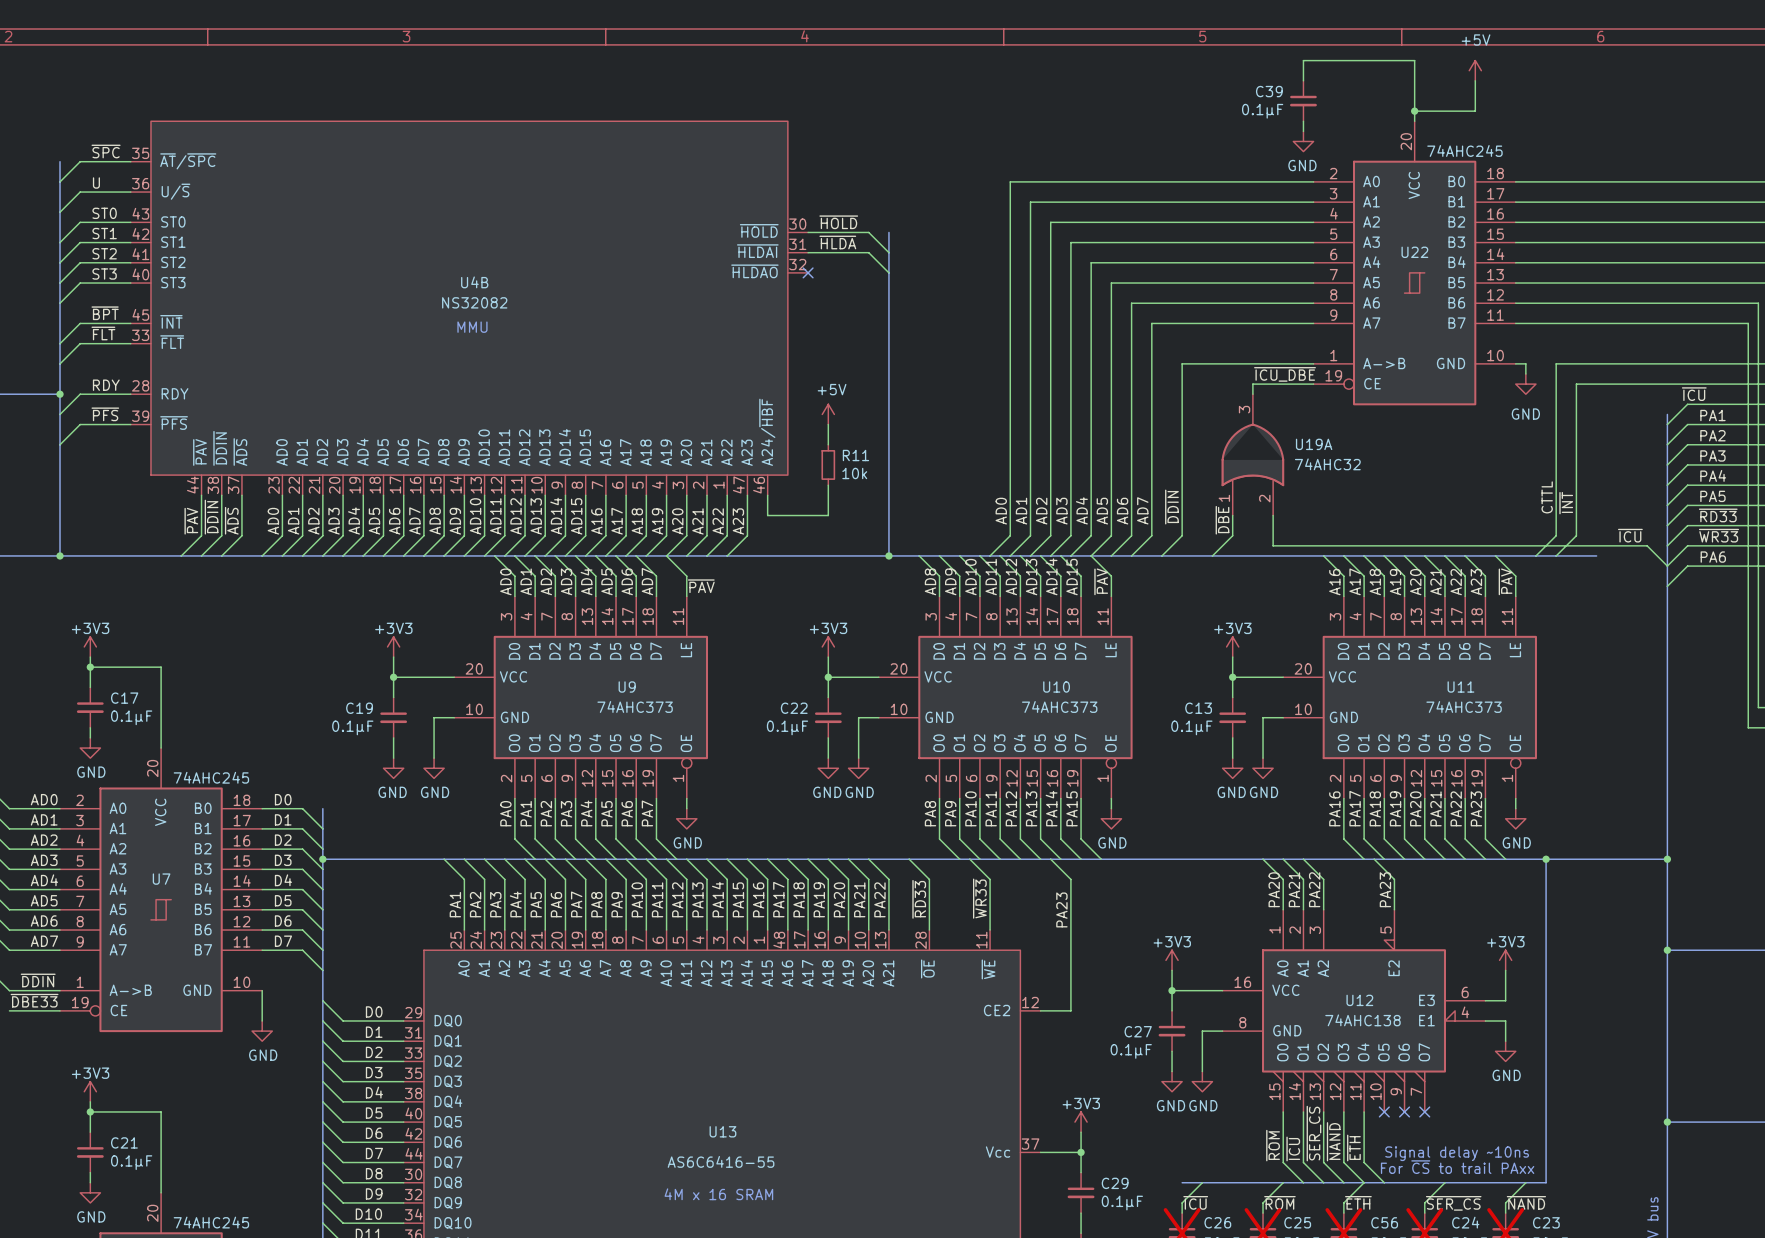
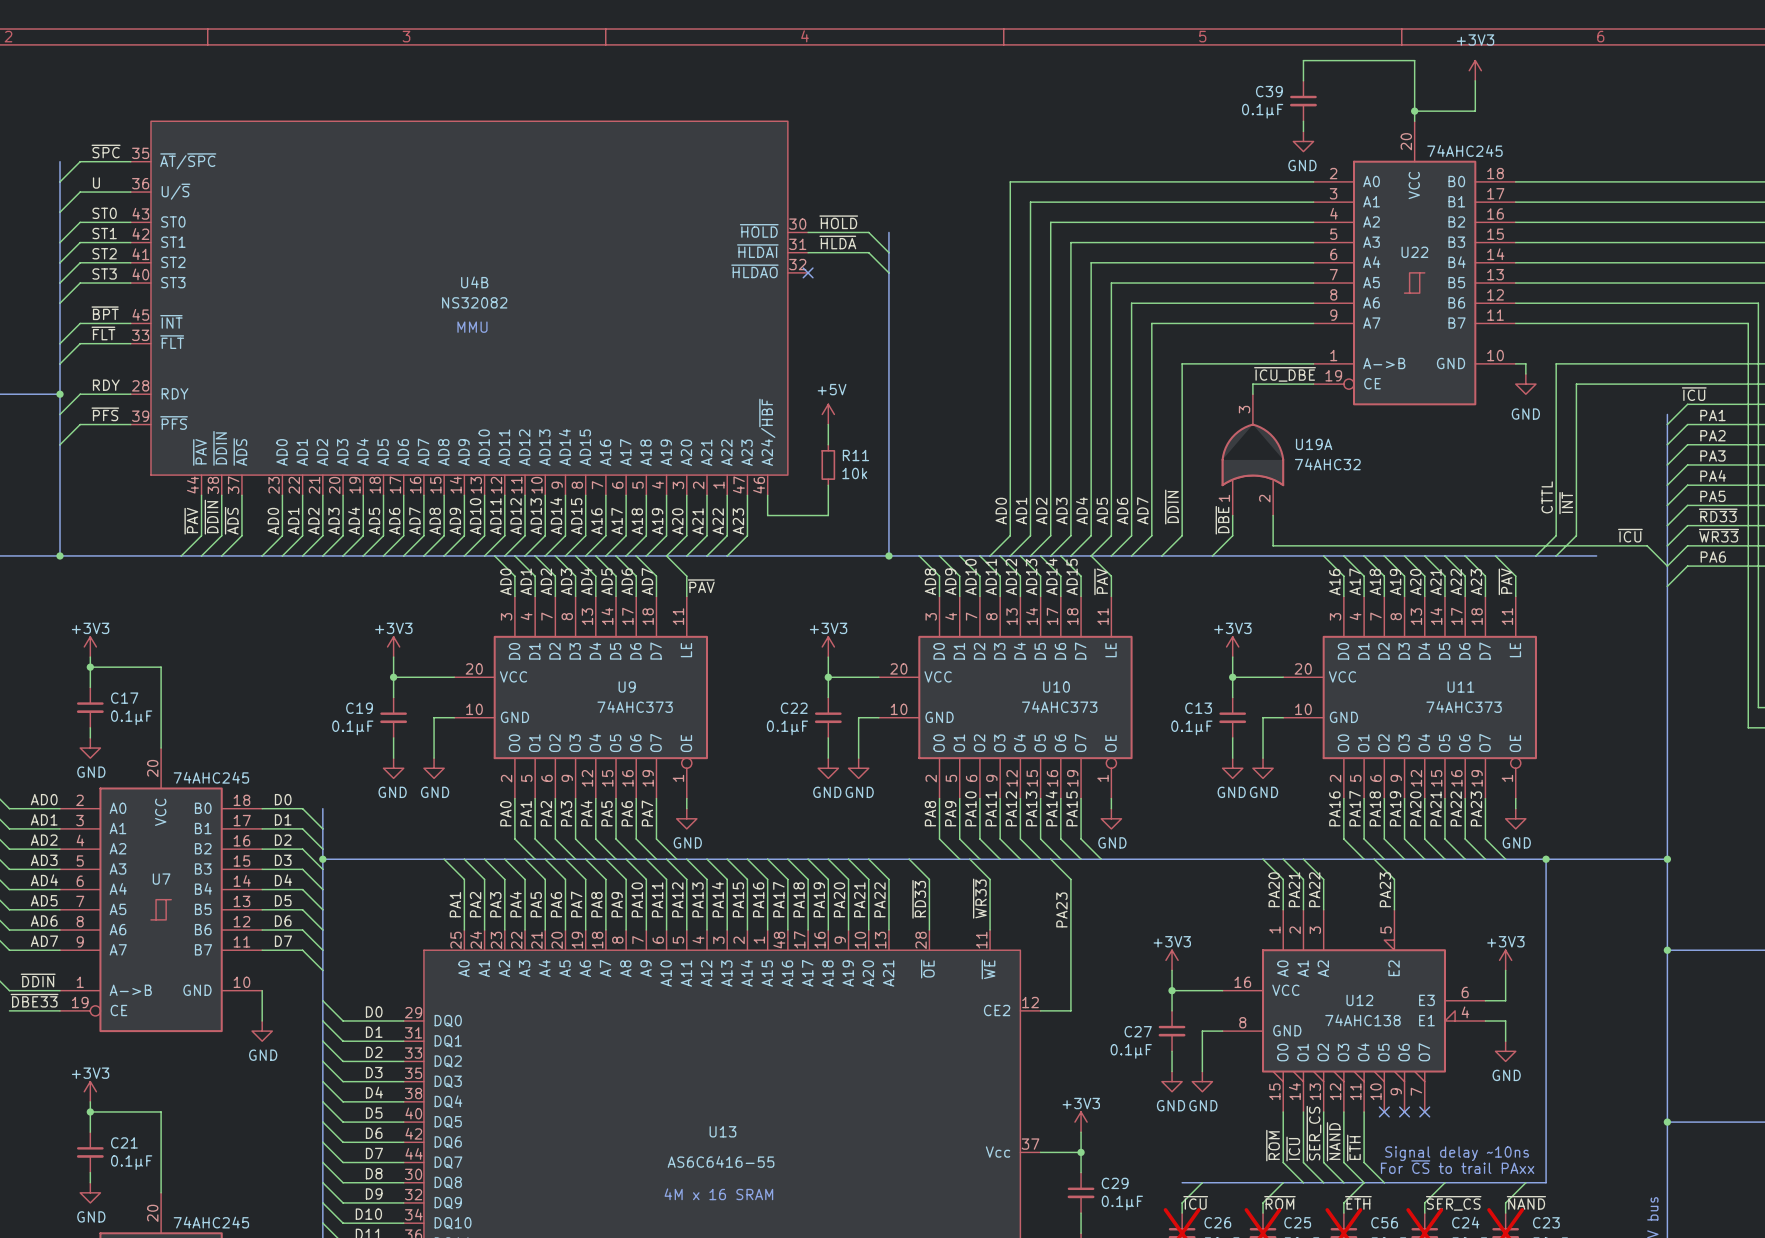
power symbol: +5V (1475, 70) -> +3V3 (1475, 70)

